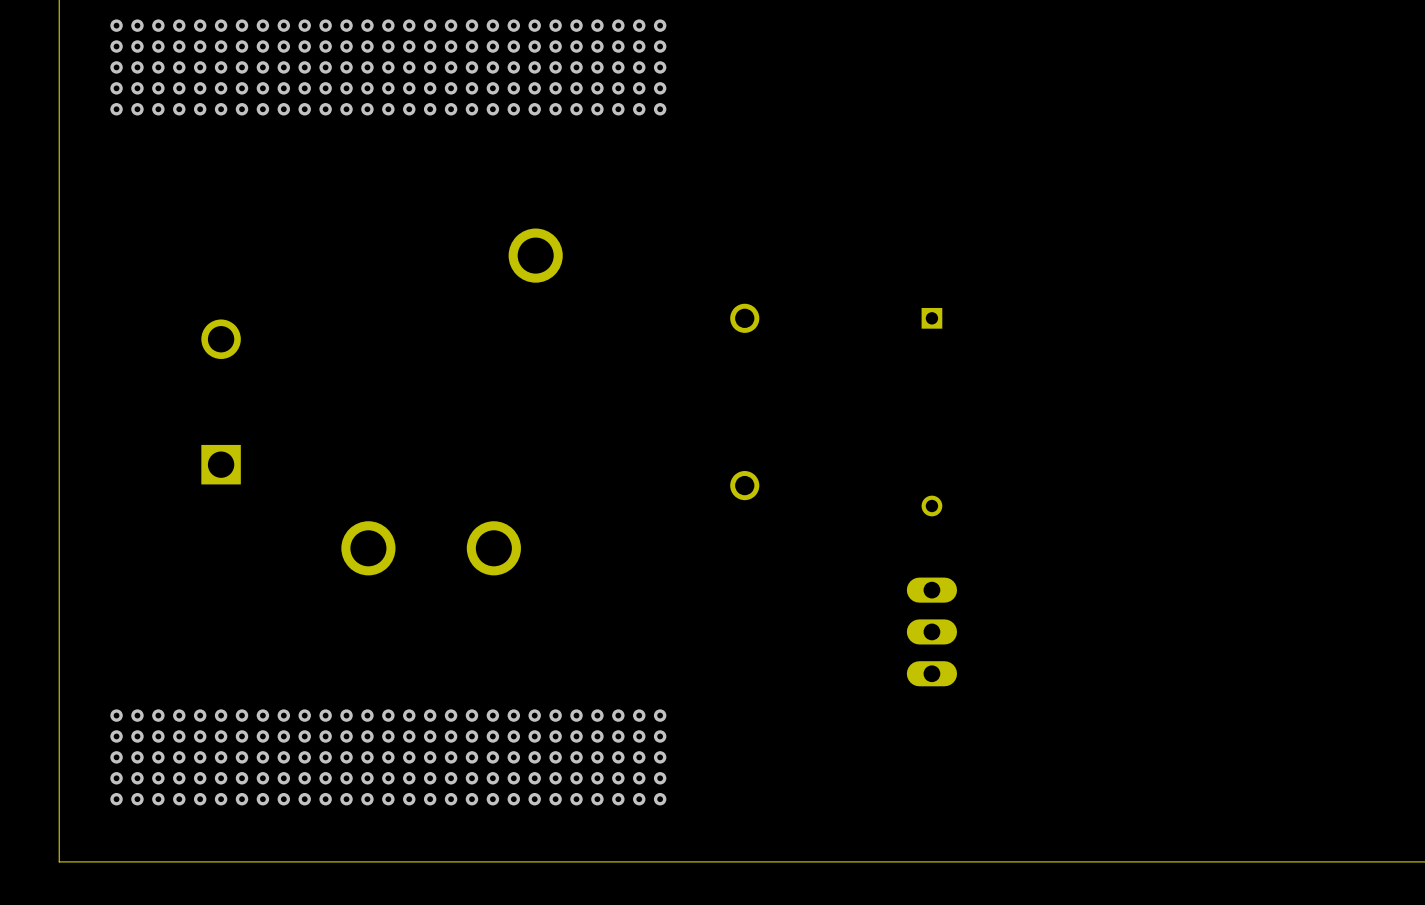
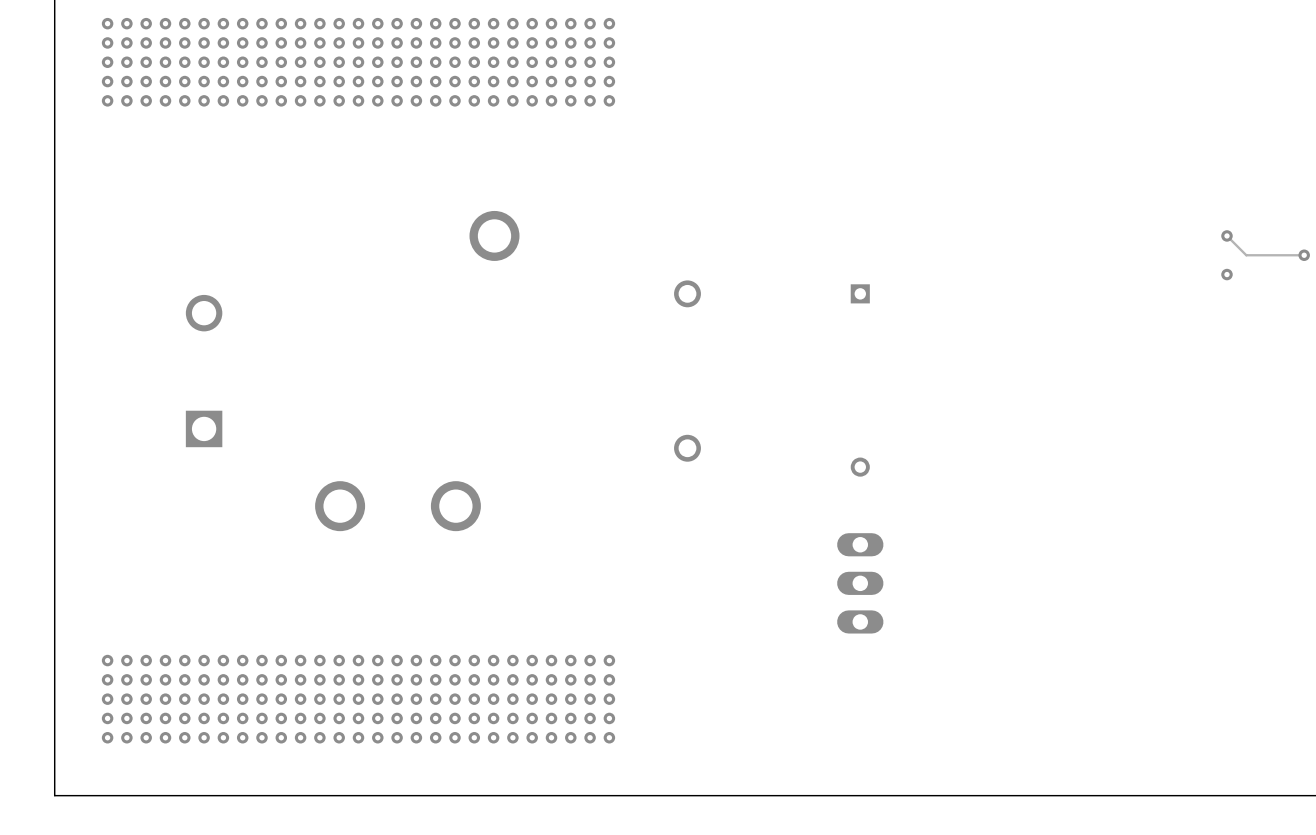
track: none -> (1226, 235) (1246, 255) (1304, 255)
via: none -> (1226, 235)
via: none -> (1304, 255)
via: none -> (1226, 274)

